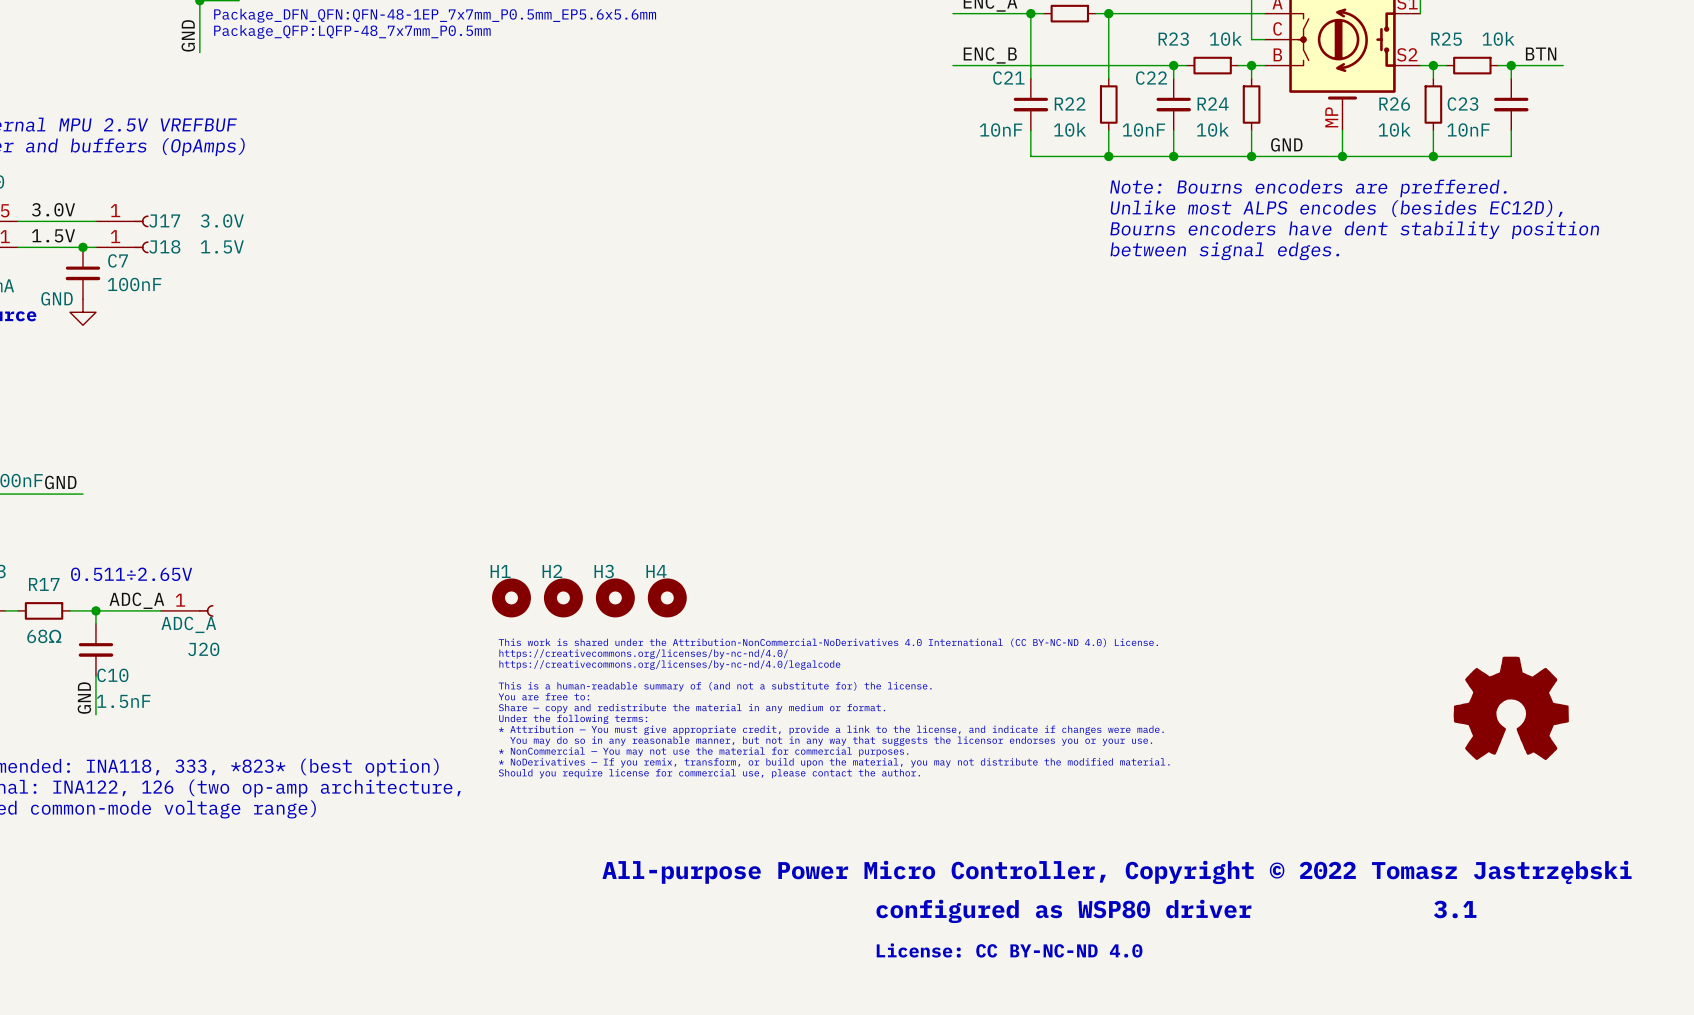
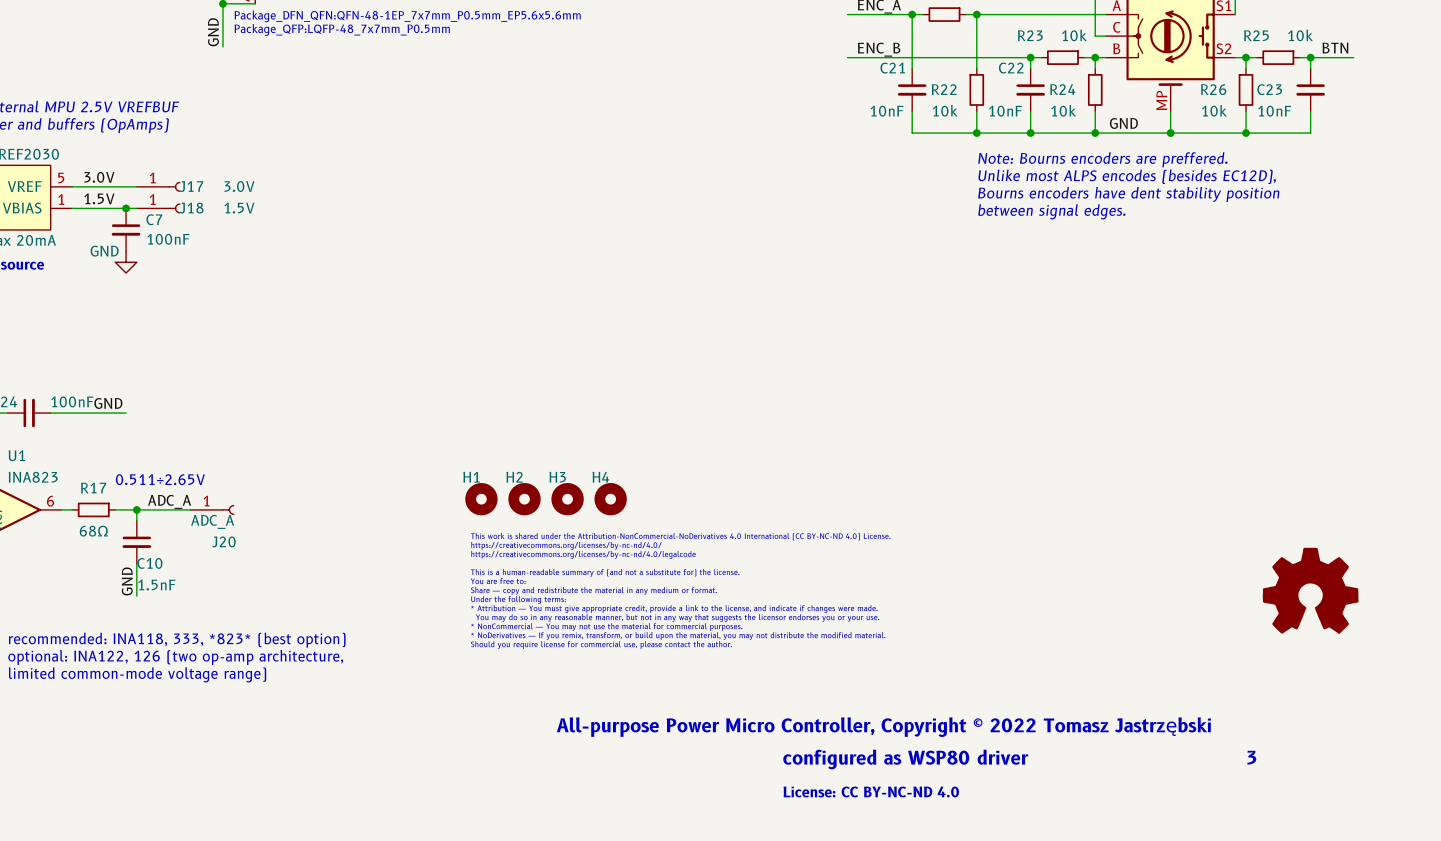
text: 3.1 (1455, 909) -> 3 (1251, 757)

